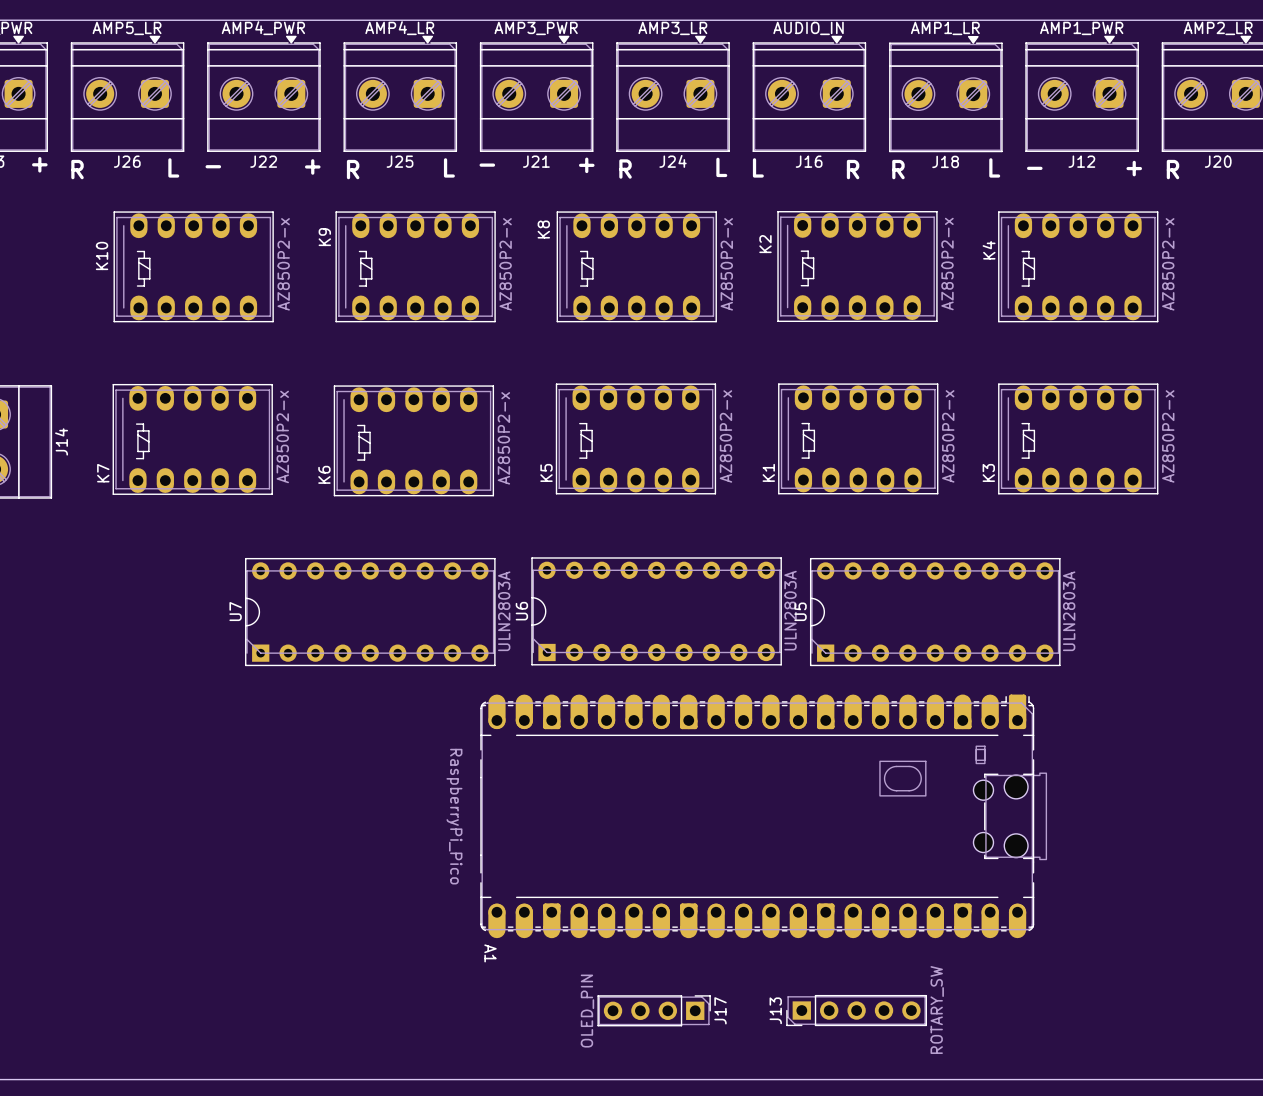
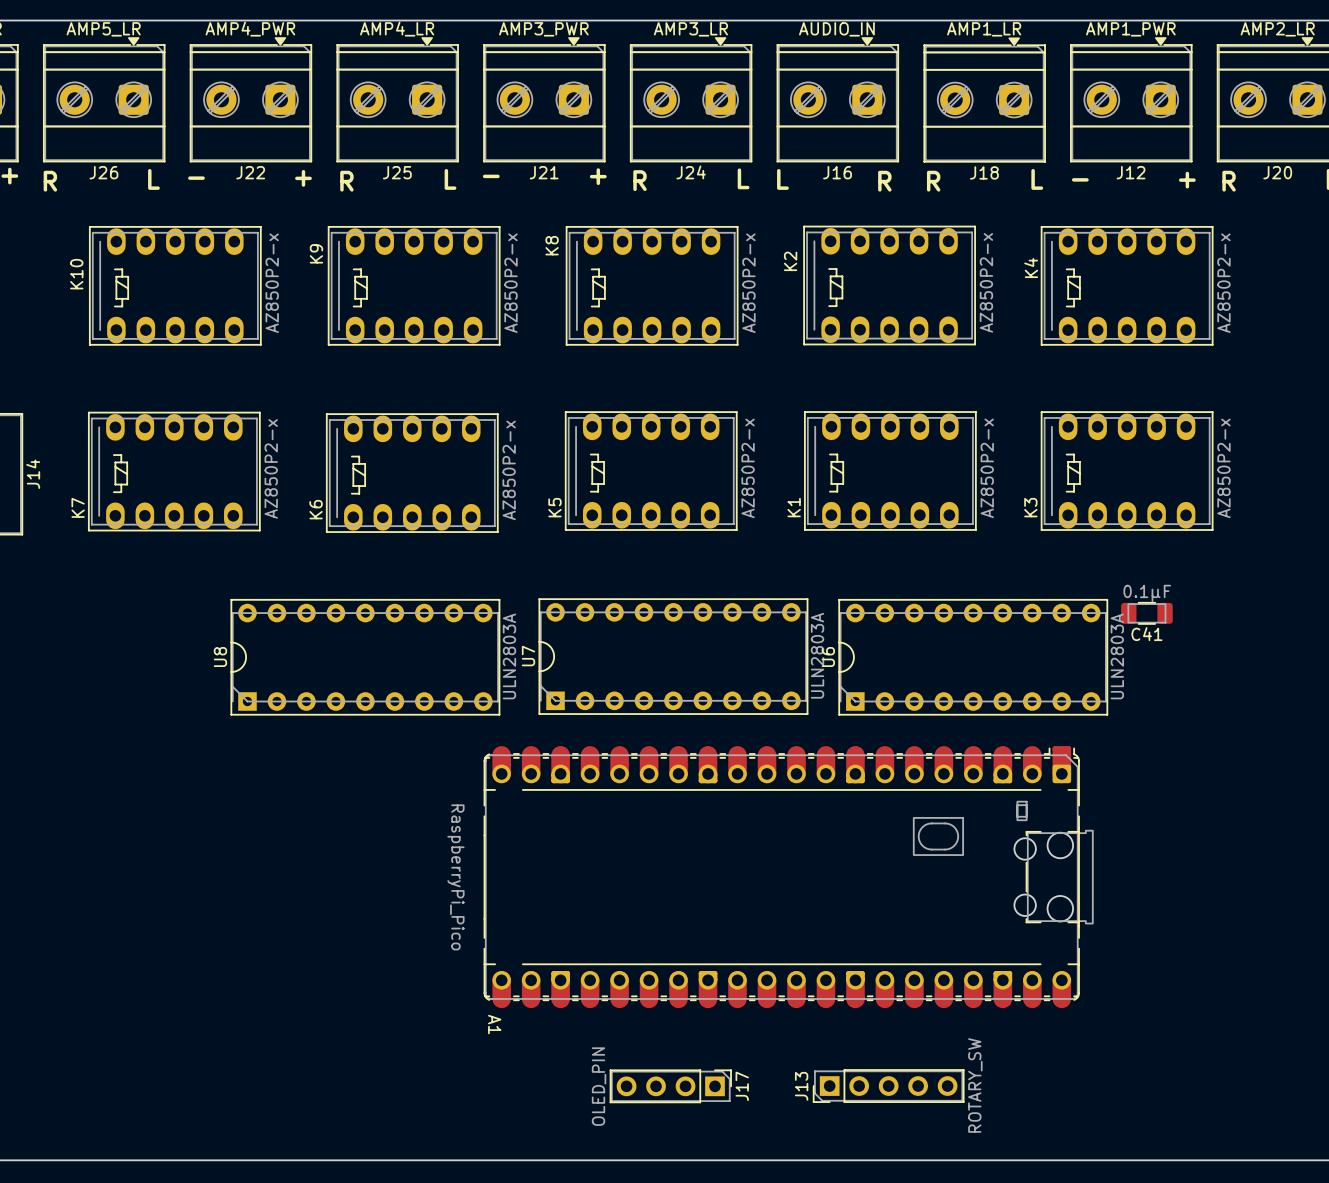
C41: none -> 0.1μF (1146, 613)
U7 name: U7 (235, 611) -> U8 (220, 657)
U6 name: U6 (521, 611) -> U7 (528, 656)
U5 name: U5 (800, 611) -> U6 (828, 657)

